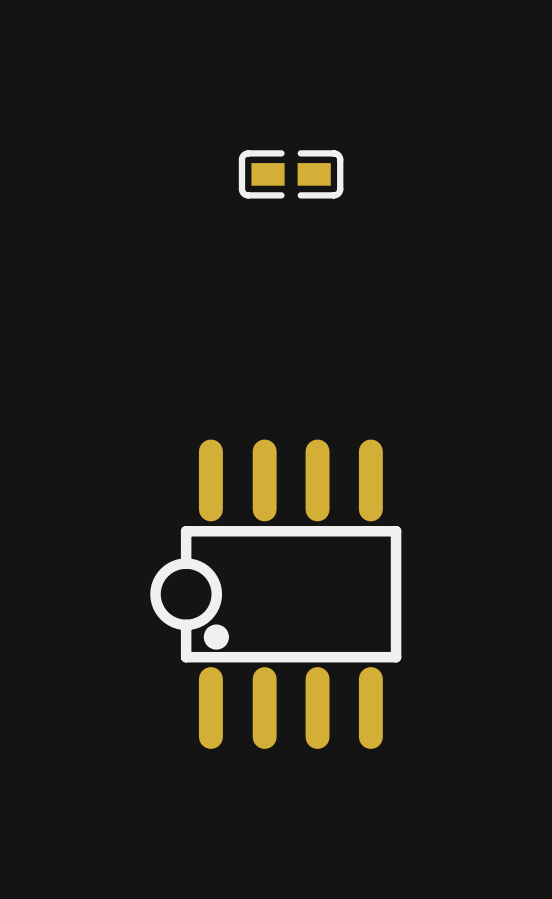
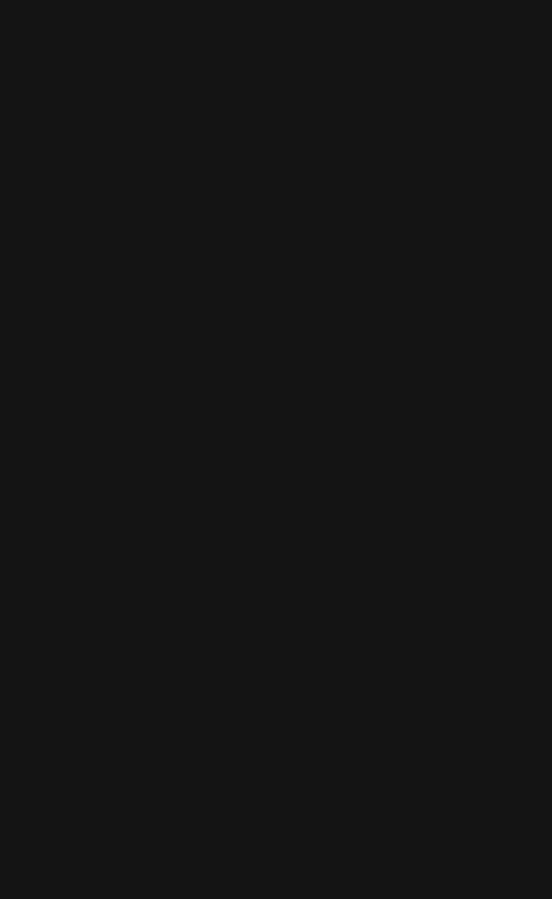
part: (291, 174) -> none
part: (275, 594) -> none

